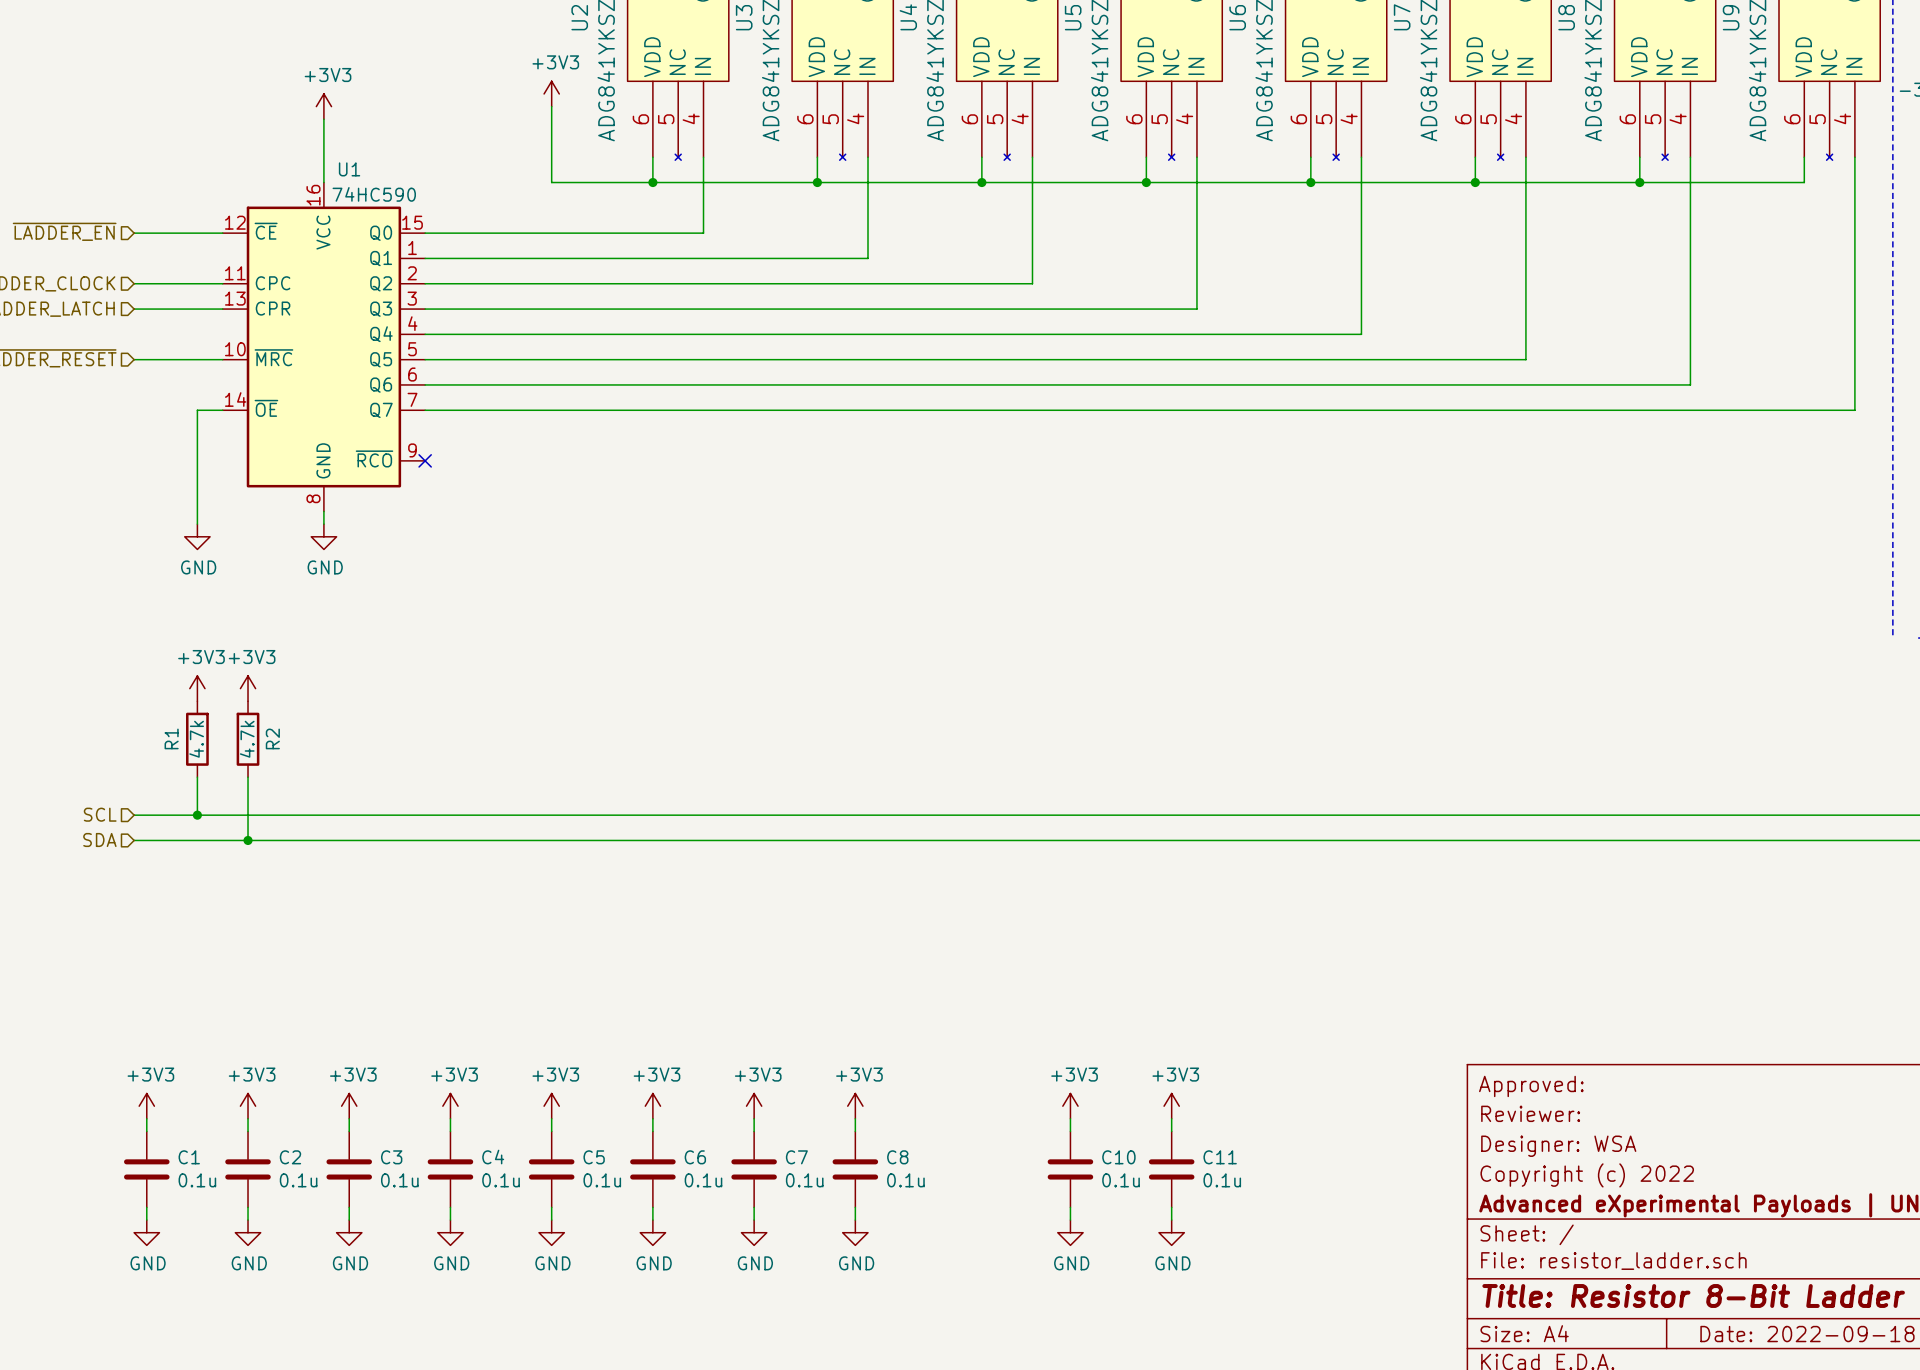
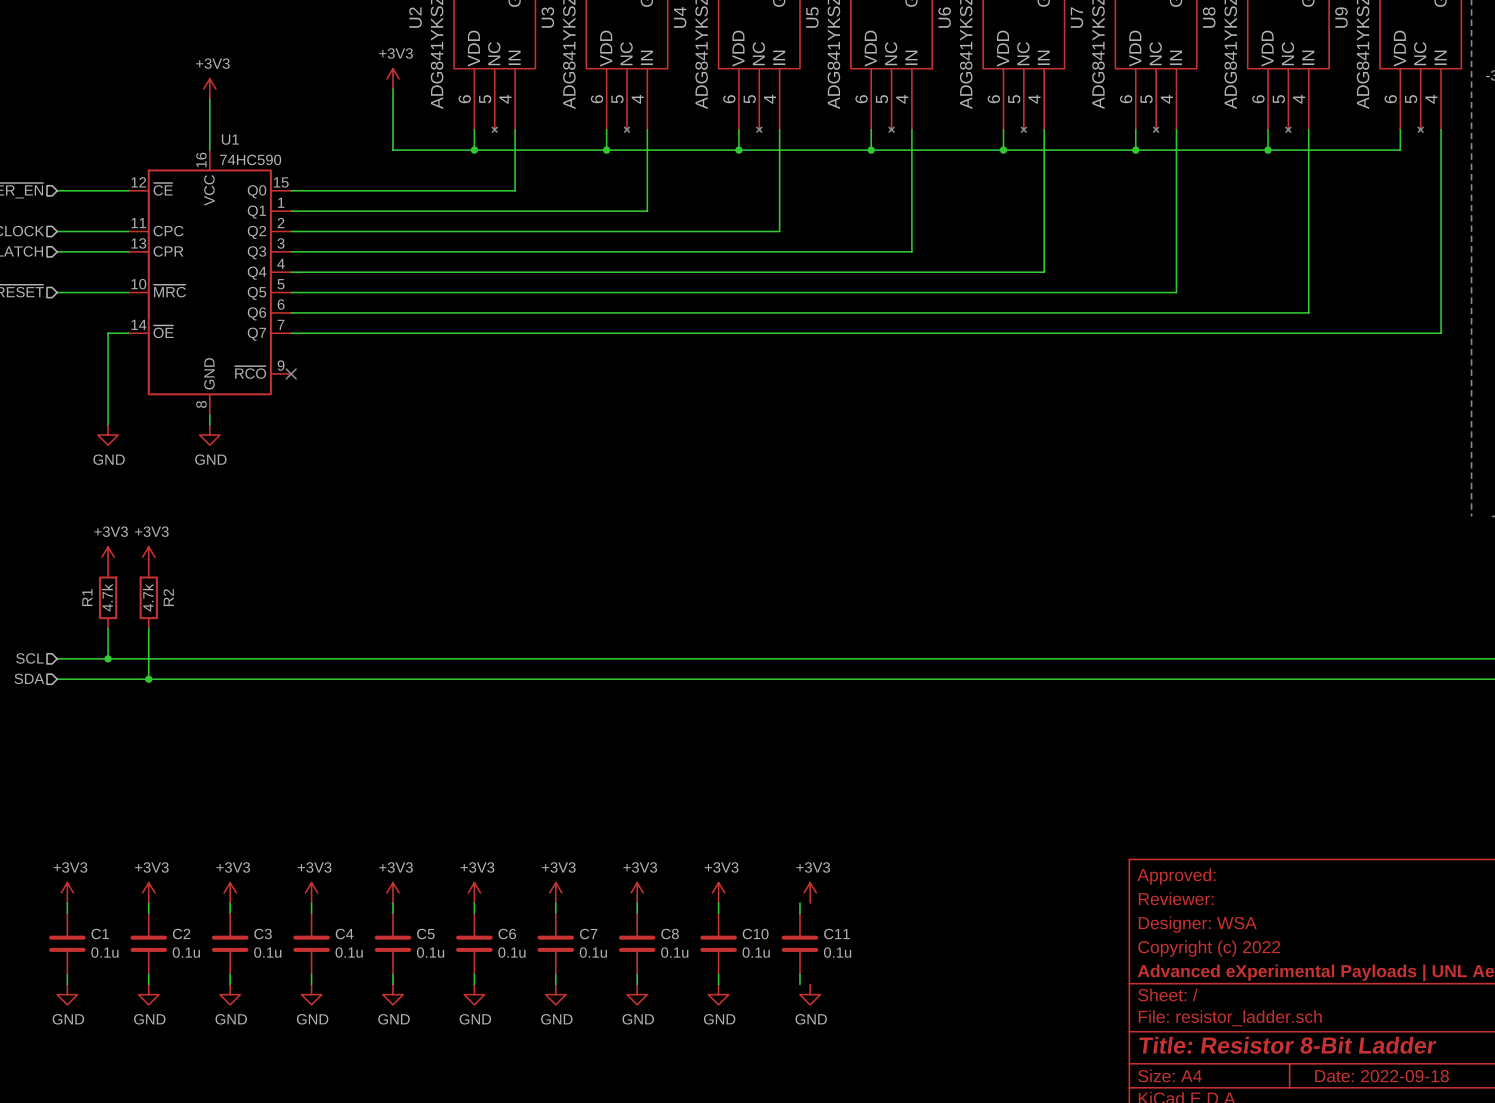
power symbol position: +3V3 (1171, 1106) -> +3V3 (718, 892)
wire: (1070, 1118) (1070, 1131) -> (718, 903) (718, 913)
wire: (1171, 1118) (1171, 1131) -> (799, 903) (799, 913)
C10 position: (1070, 1169) -> (718, 943)
C11 position: (1171, 1169) -> (799, 943)
wire: (1070, 1207) (1070, 1220) -> (718, 974) (718, 984)
wire: (1171, 1207) (1171, 1220) -> (799, 974) (799, 984)
power symbol position: GND (1171, 1232) -> GND (718, 994)

